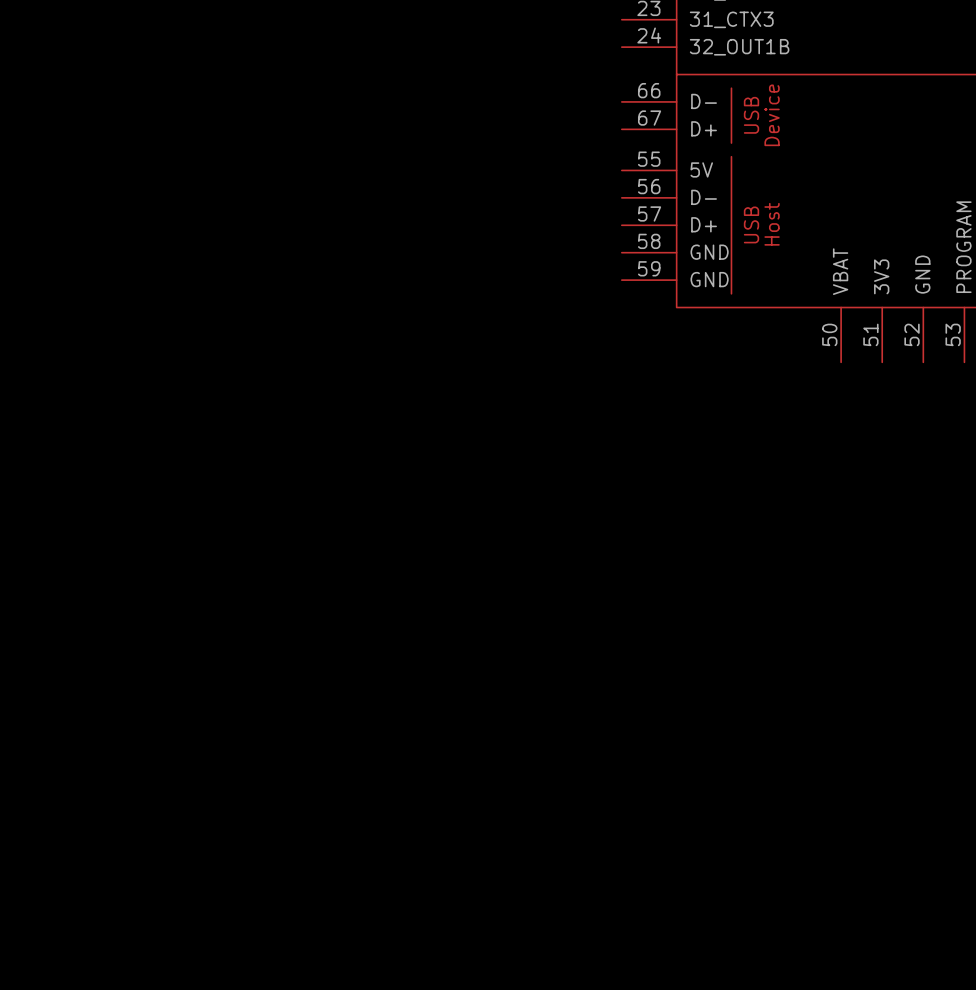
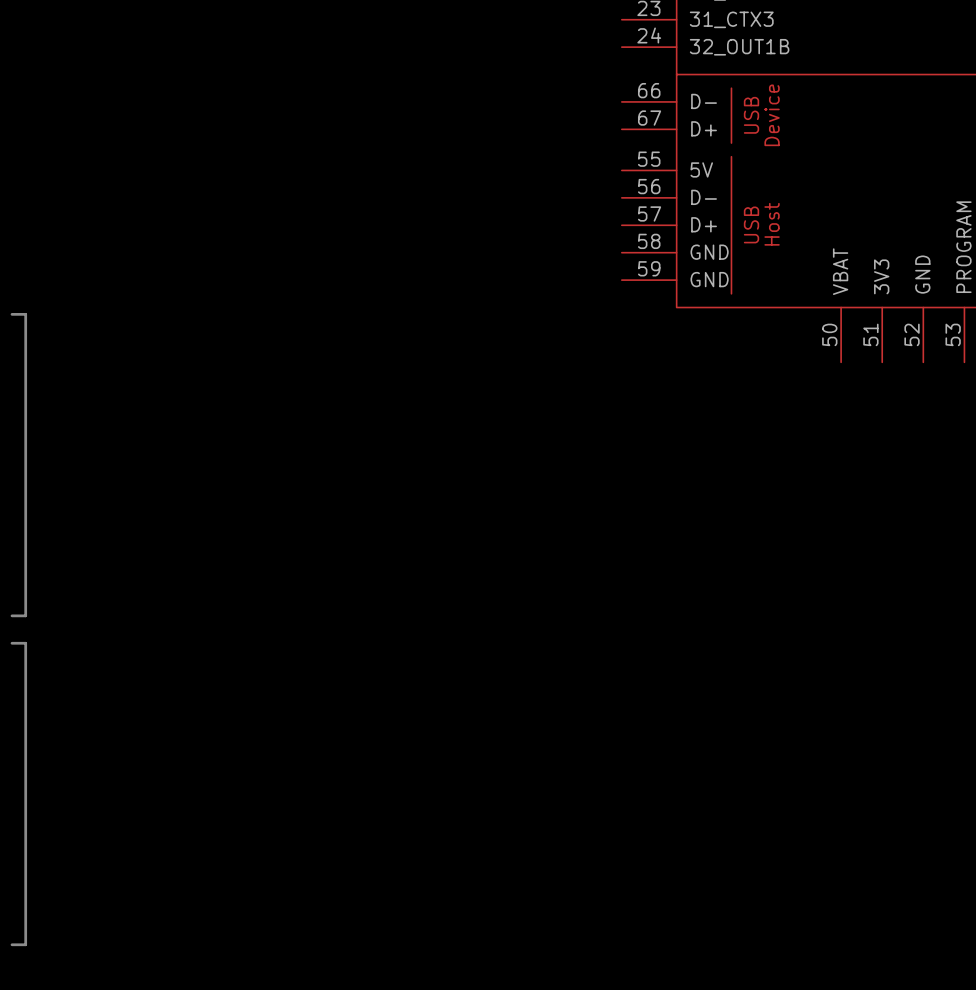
line: none -> (11, 314) (25, 314) (25, 615) (11, 615)
line: none -> (11, 643) (25, 643) (25, 944) (11, 944)

